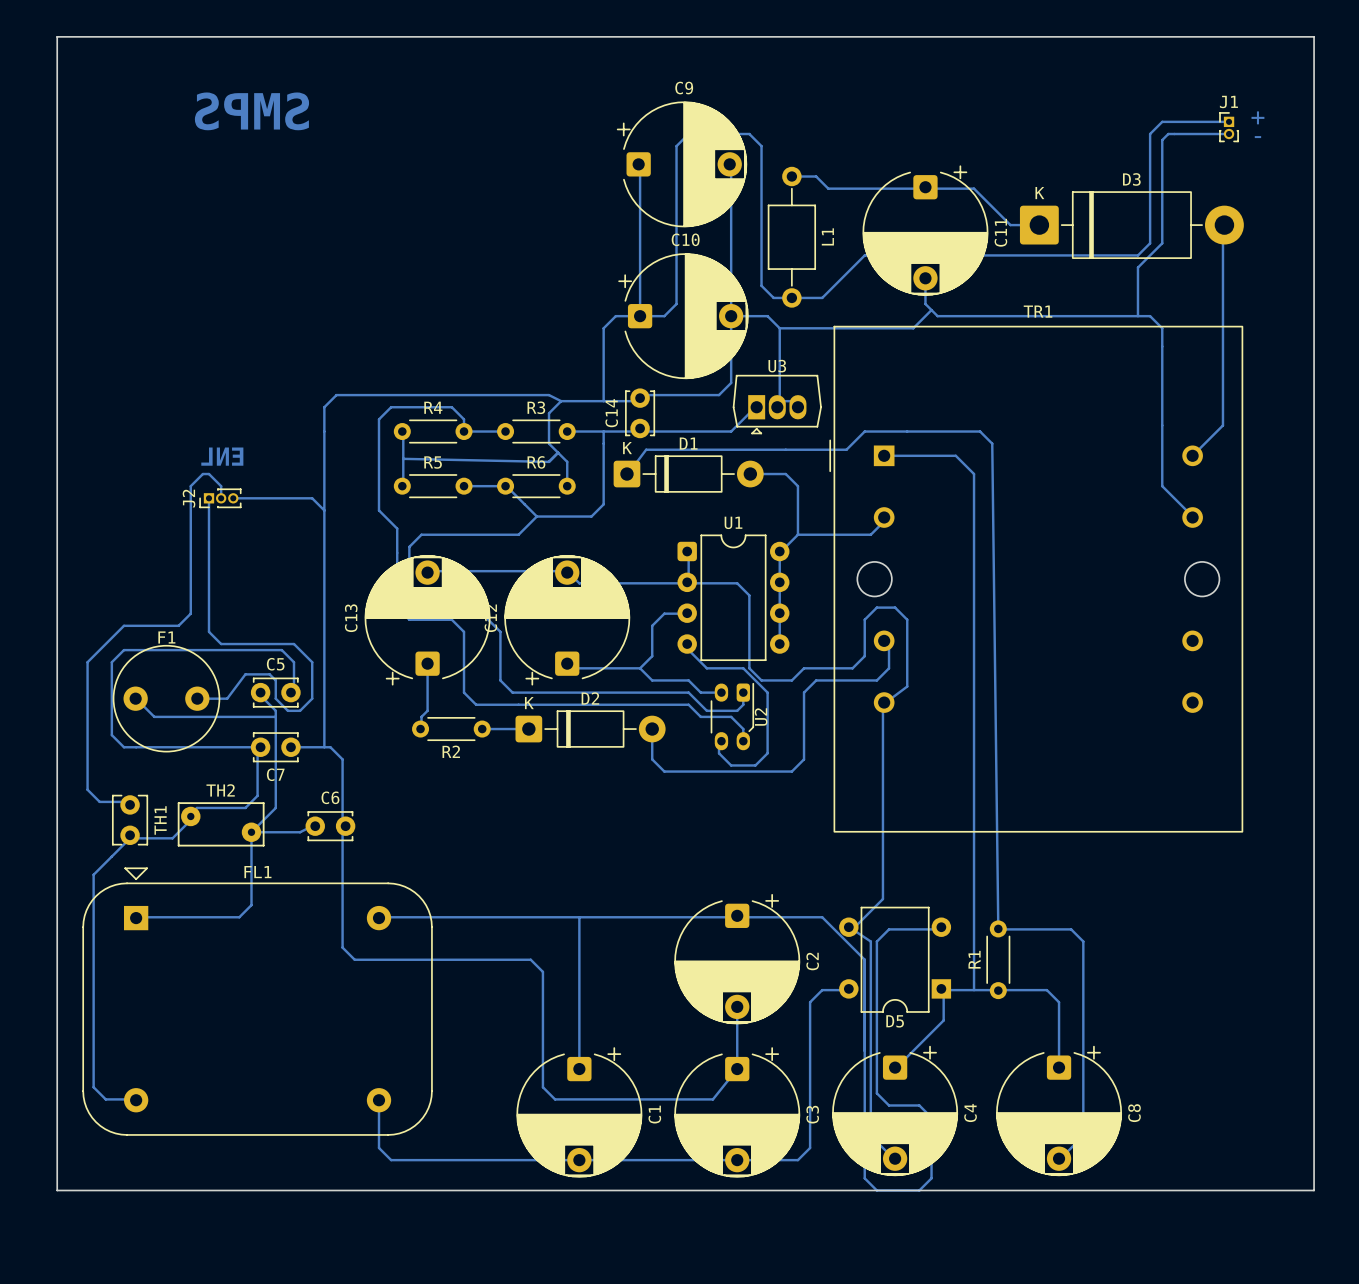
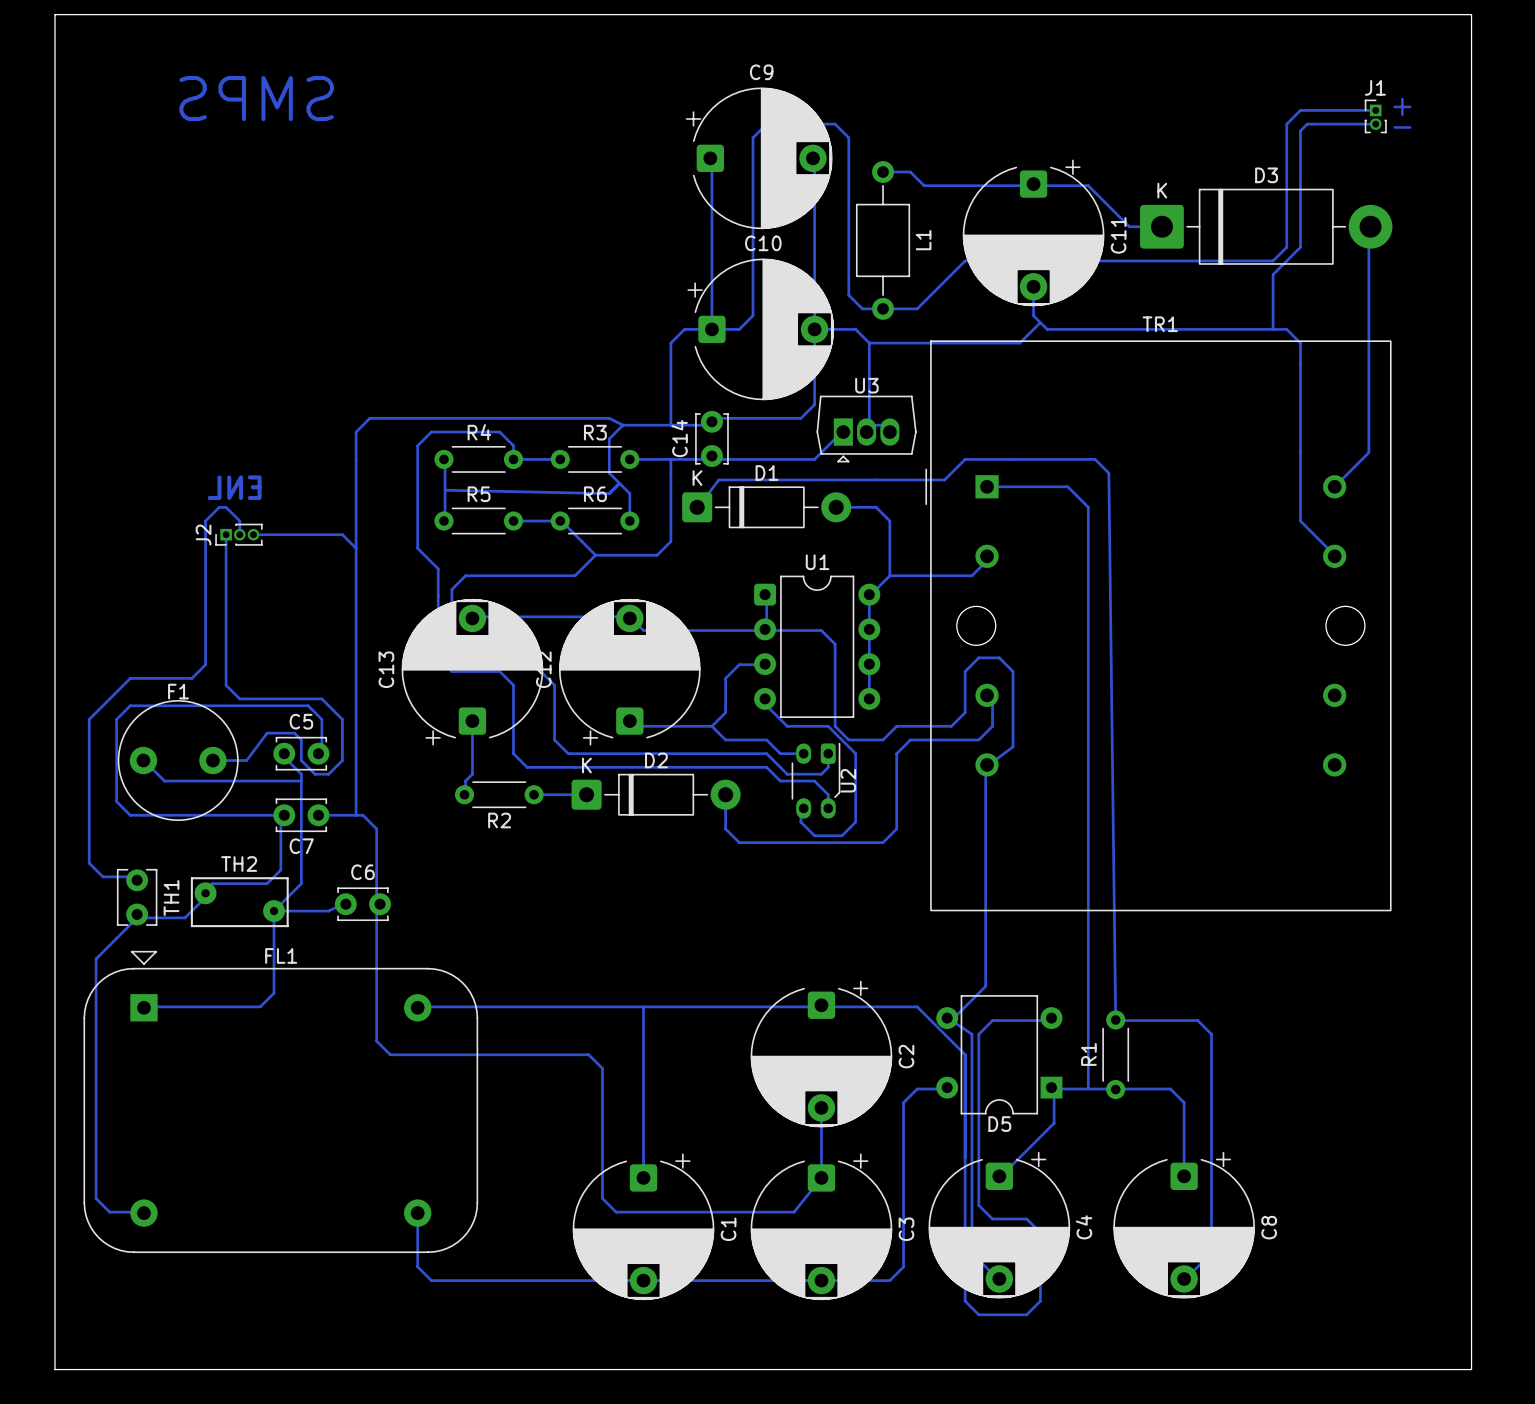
board edge: (57, 1190) (1314, 1190) -> (55, 1314) (55, 1369) (1471, 1369) (1471, 1314)

